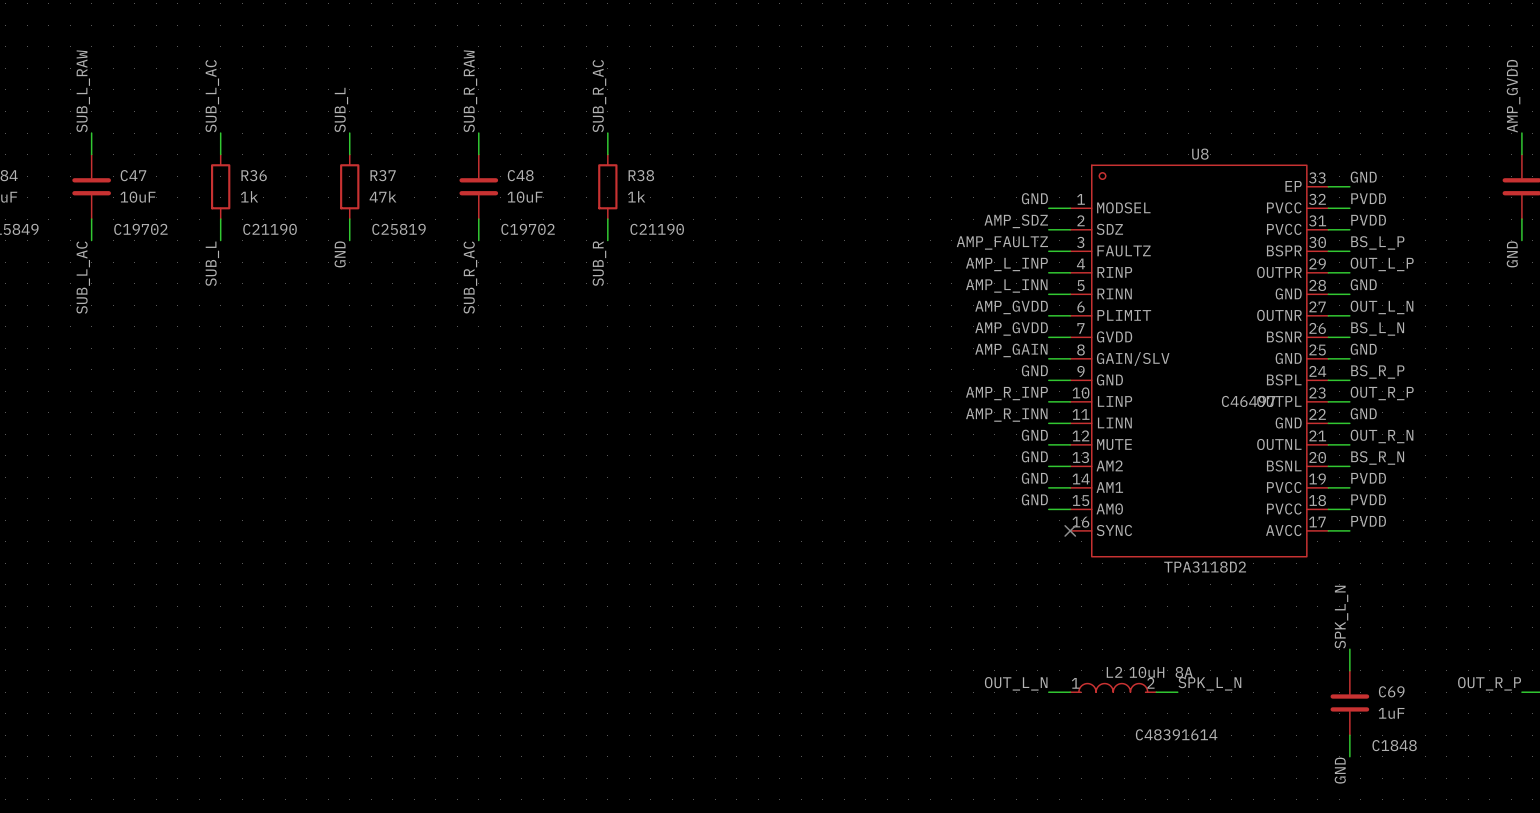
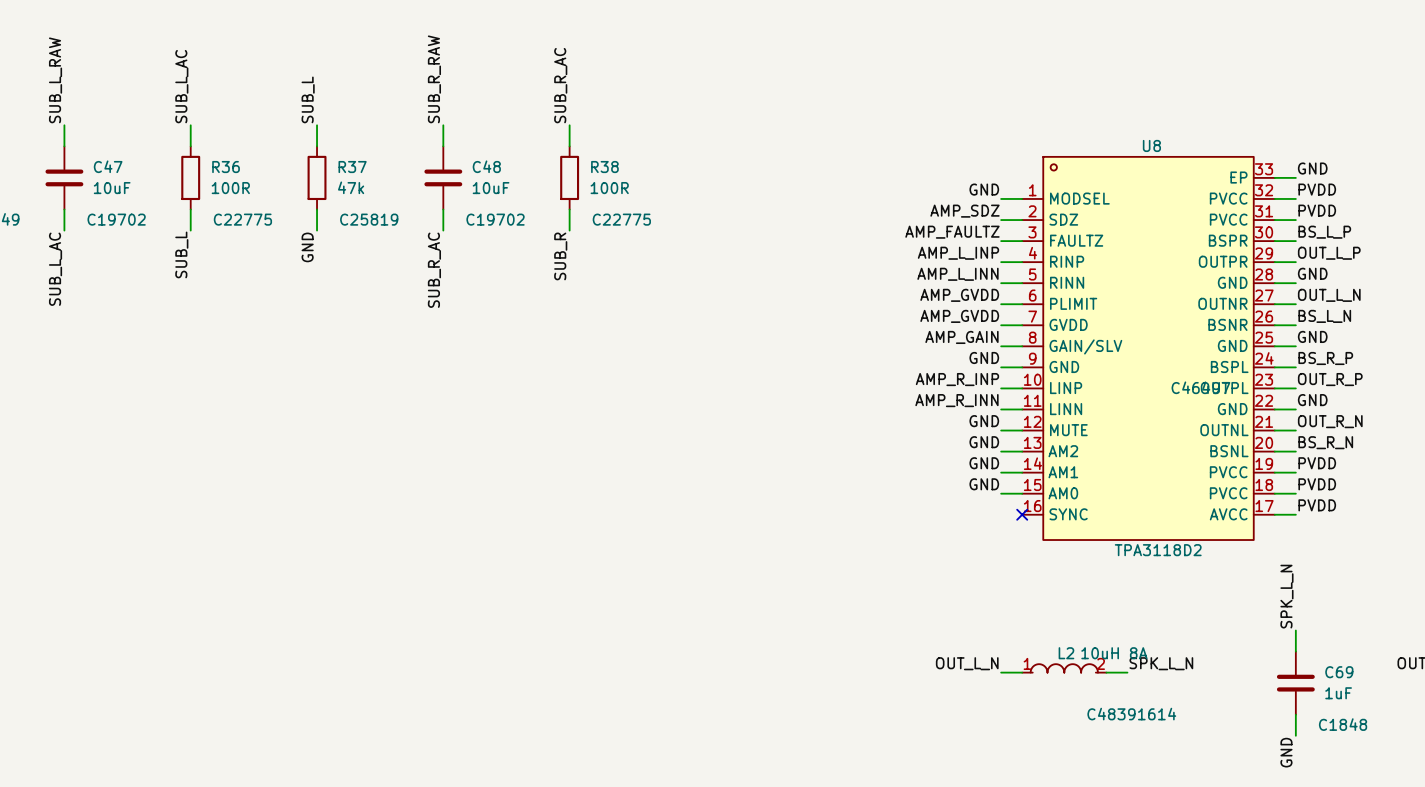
R36 value: 1k (249, 196) -> 100R (230, 188)
R38 value: 1k (636, 196) -> 100R (609, 188)
R36 text: C21190 (270, 229) -> C22775 (242, 219)
R38 text: C21190 (657, 229) -> C22775 (621, 219)

